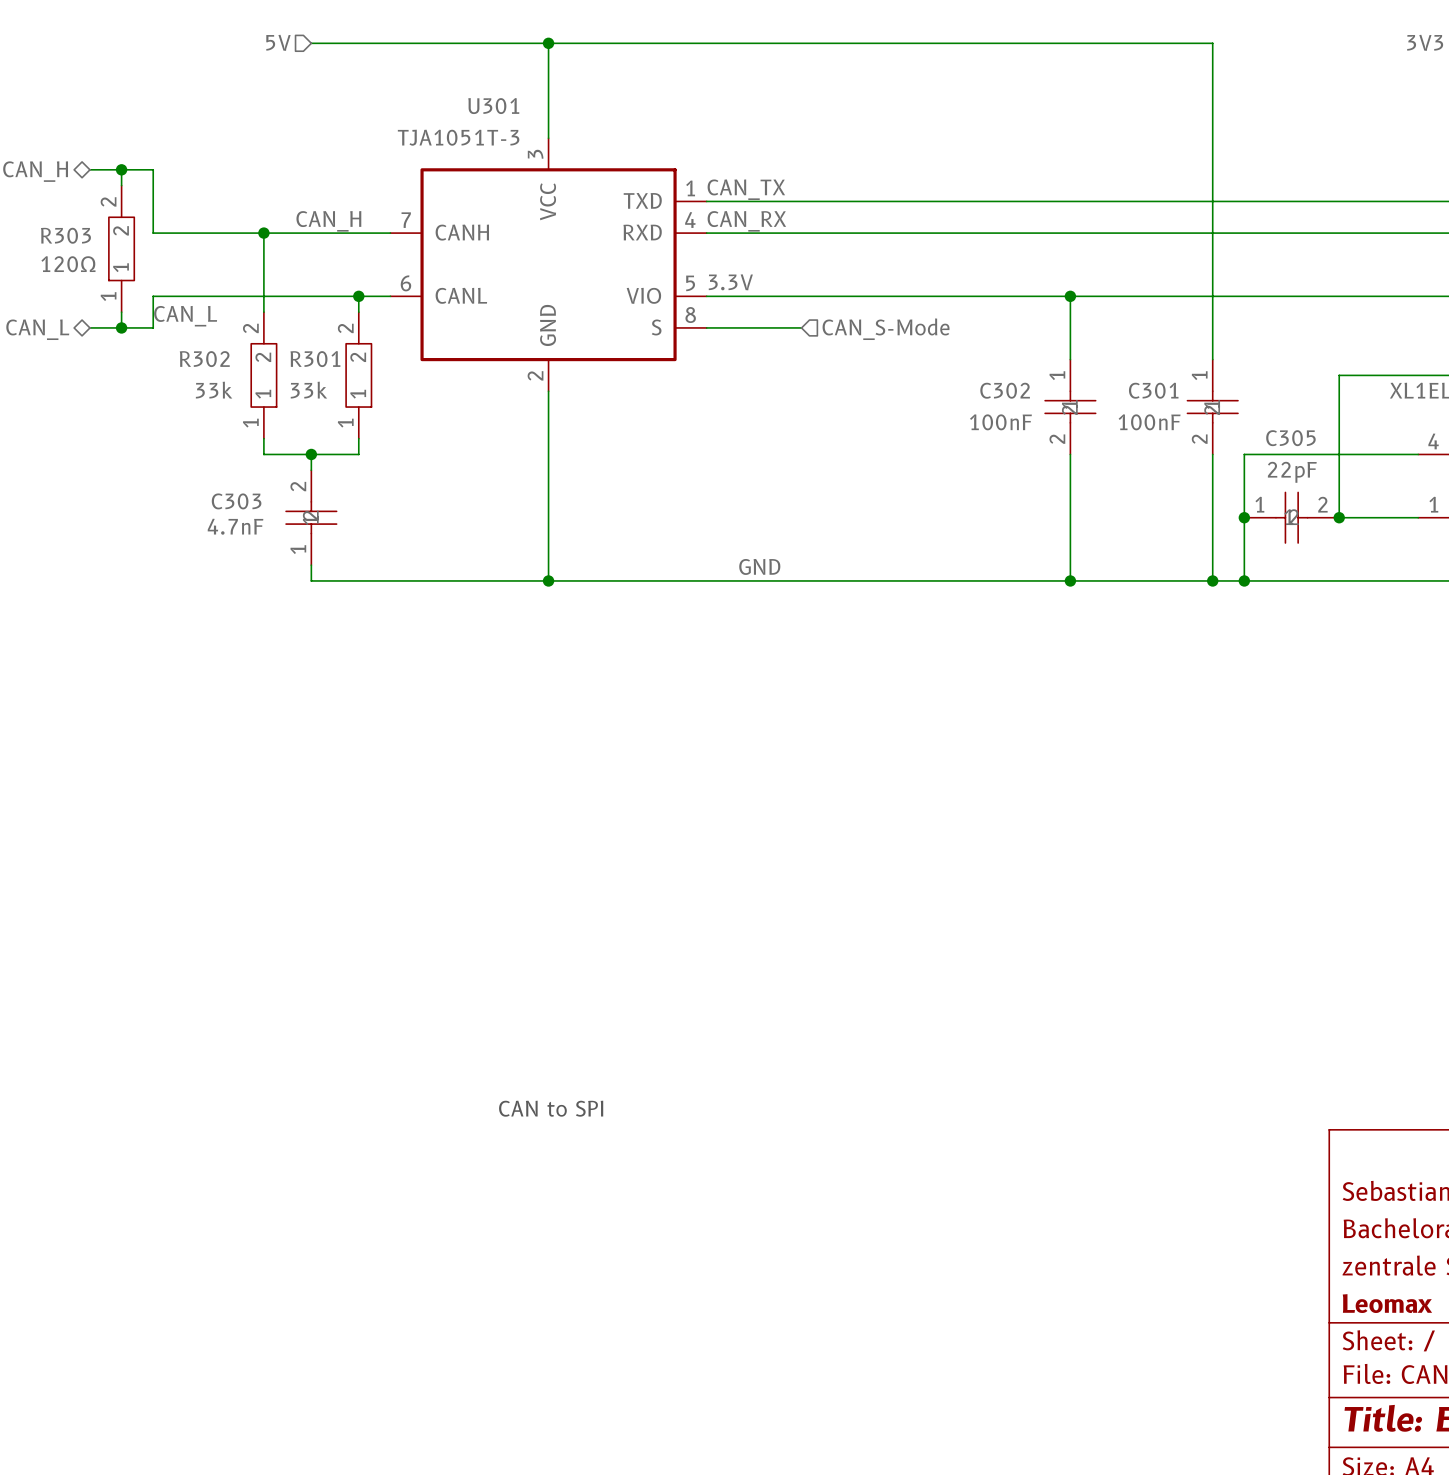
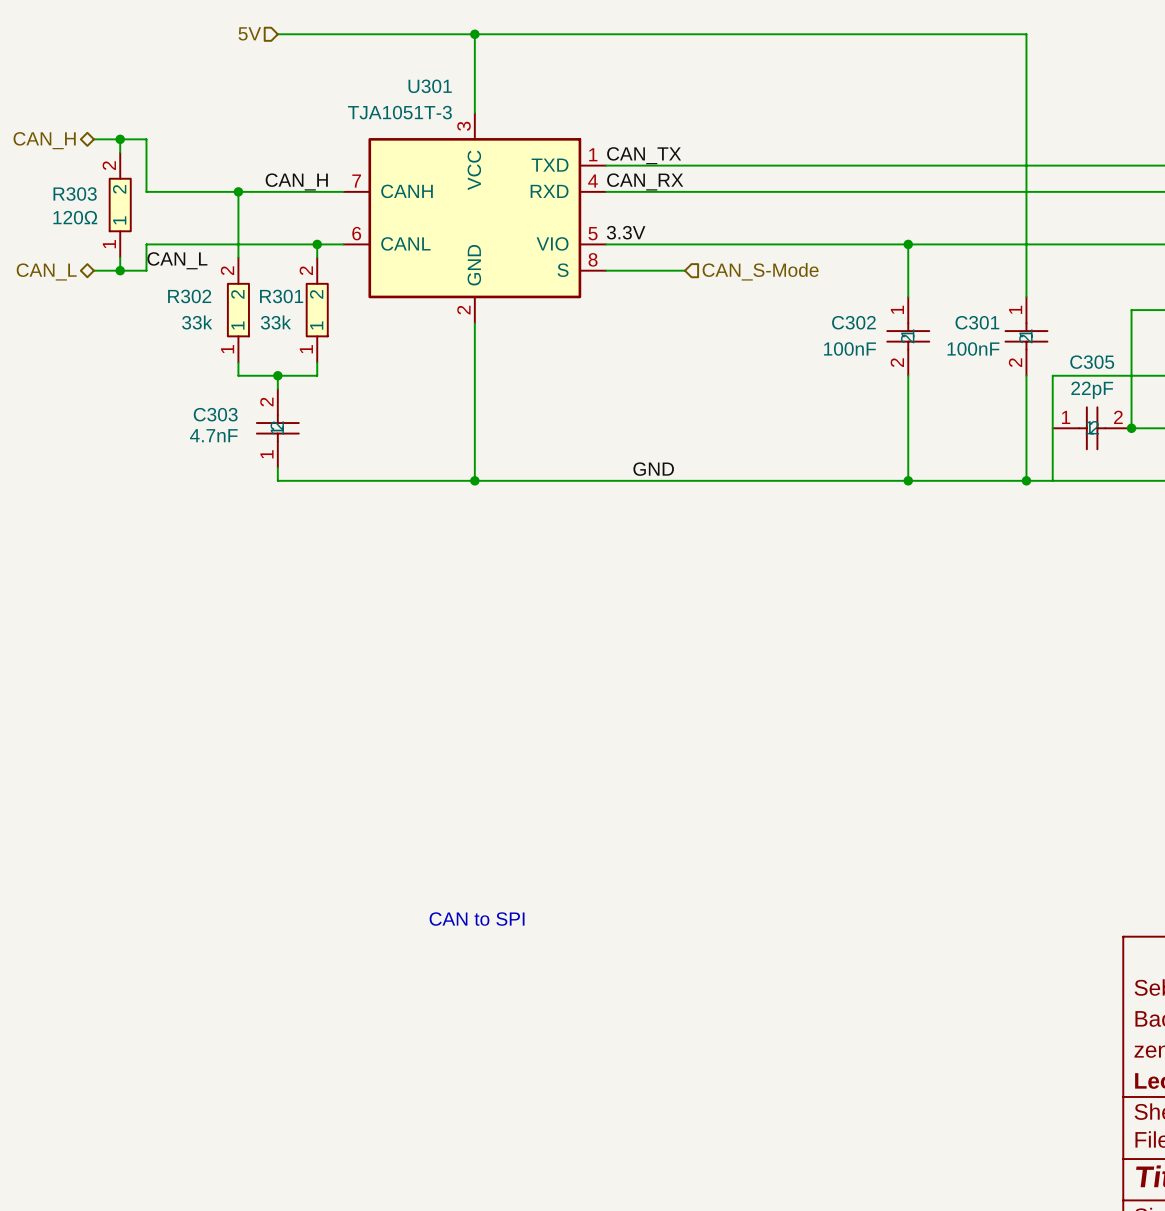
junction: (1244, 517) -> none
junction: (1244, 580) -> none

